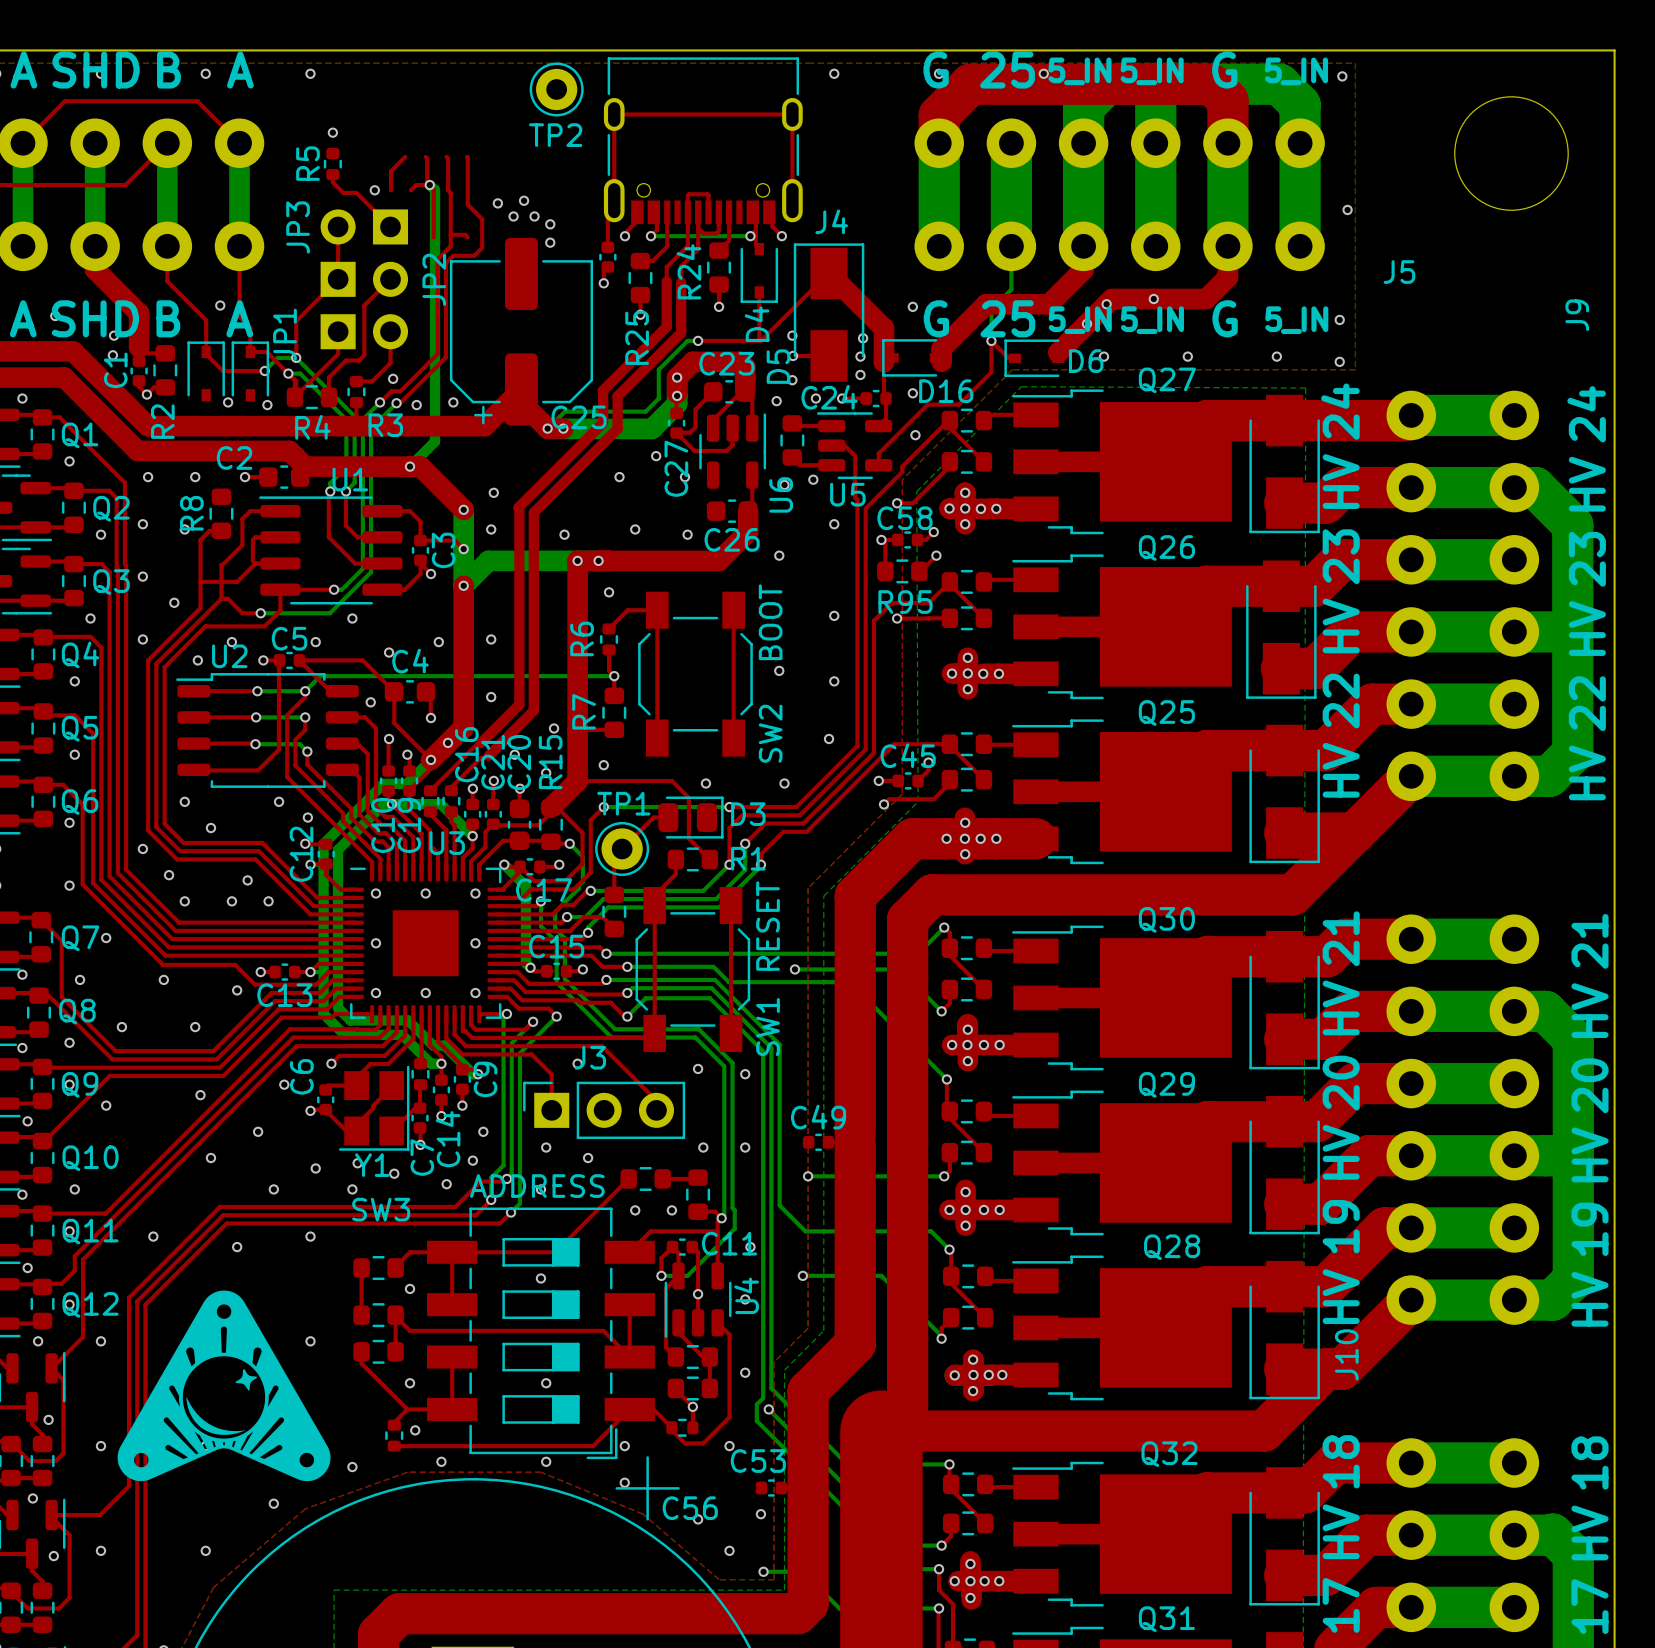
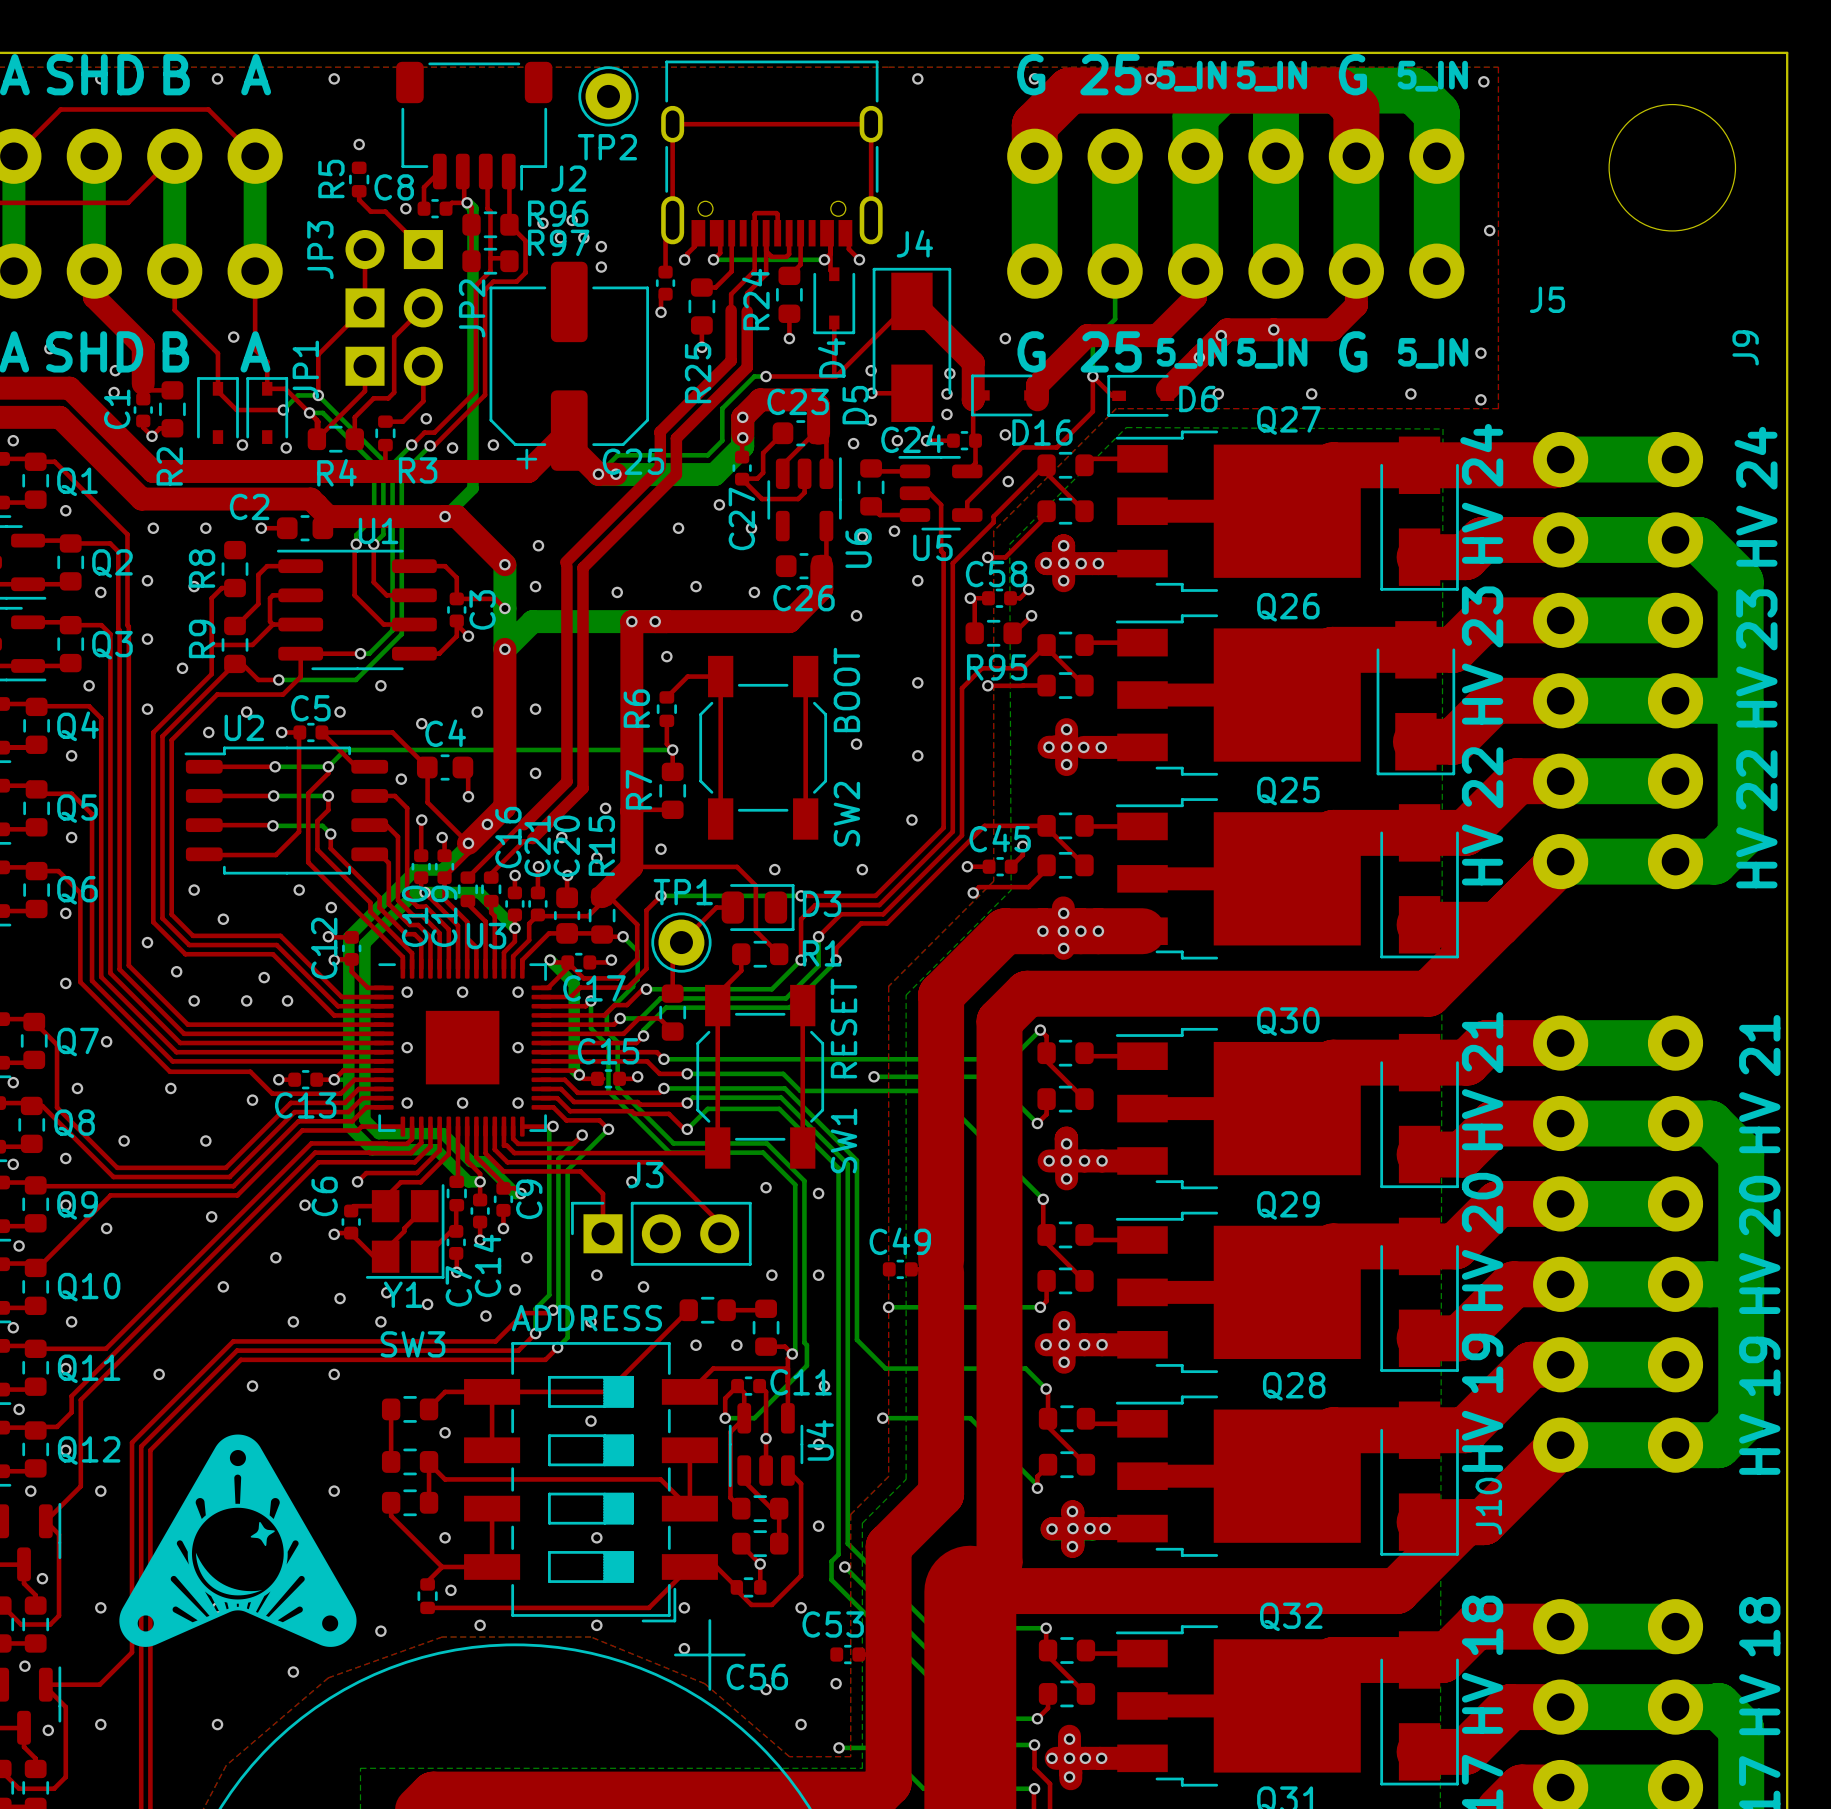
J2: none -> (474, 126)
C8: none -> (435, 208)
R96: none -> (490, 224)
R97: none -> (490, 261)
top track: (221, 564) (221, 598) -> none
R9: none -> (235, 644)

